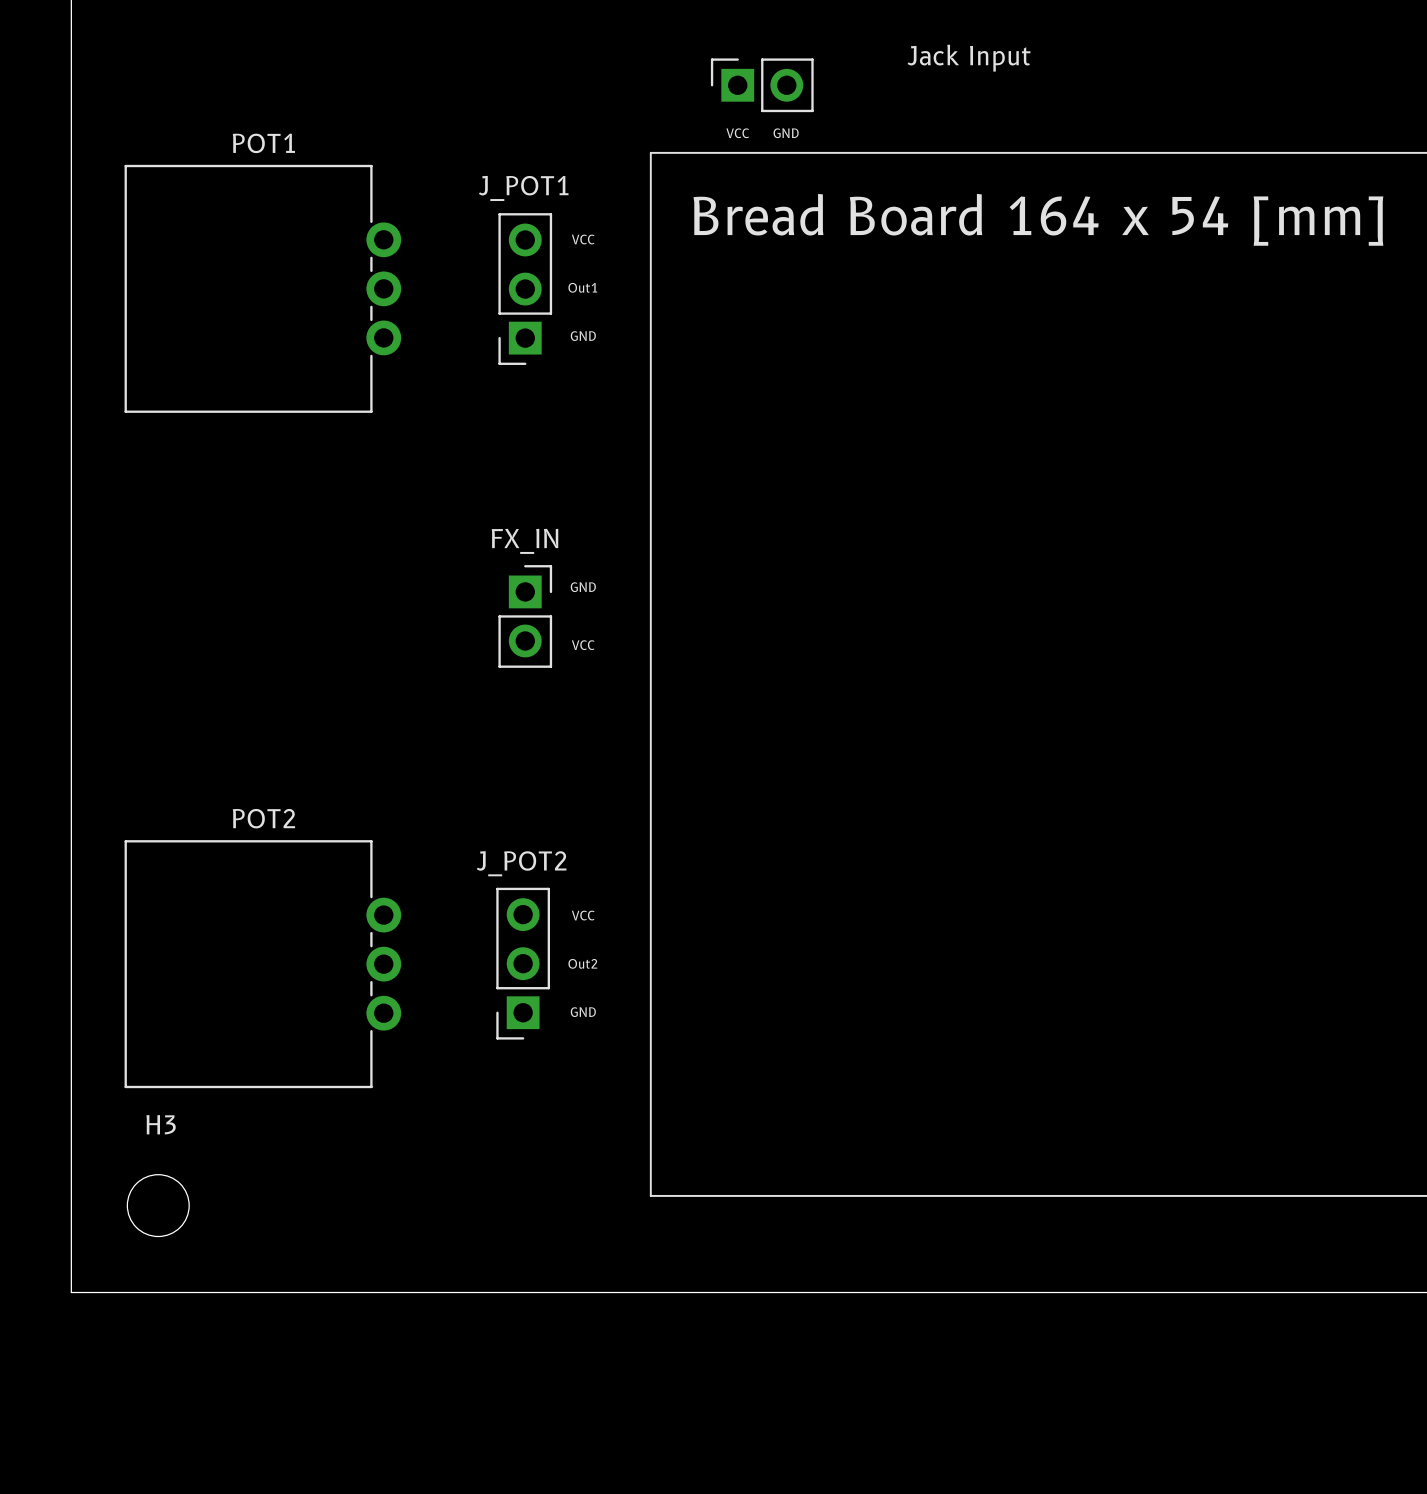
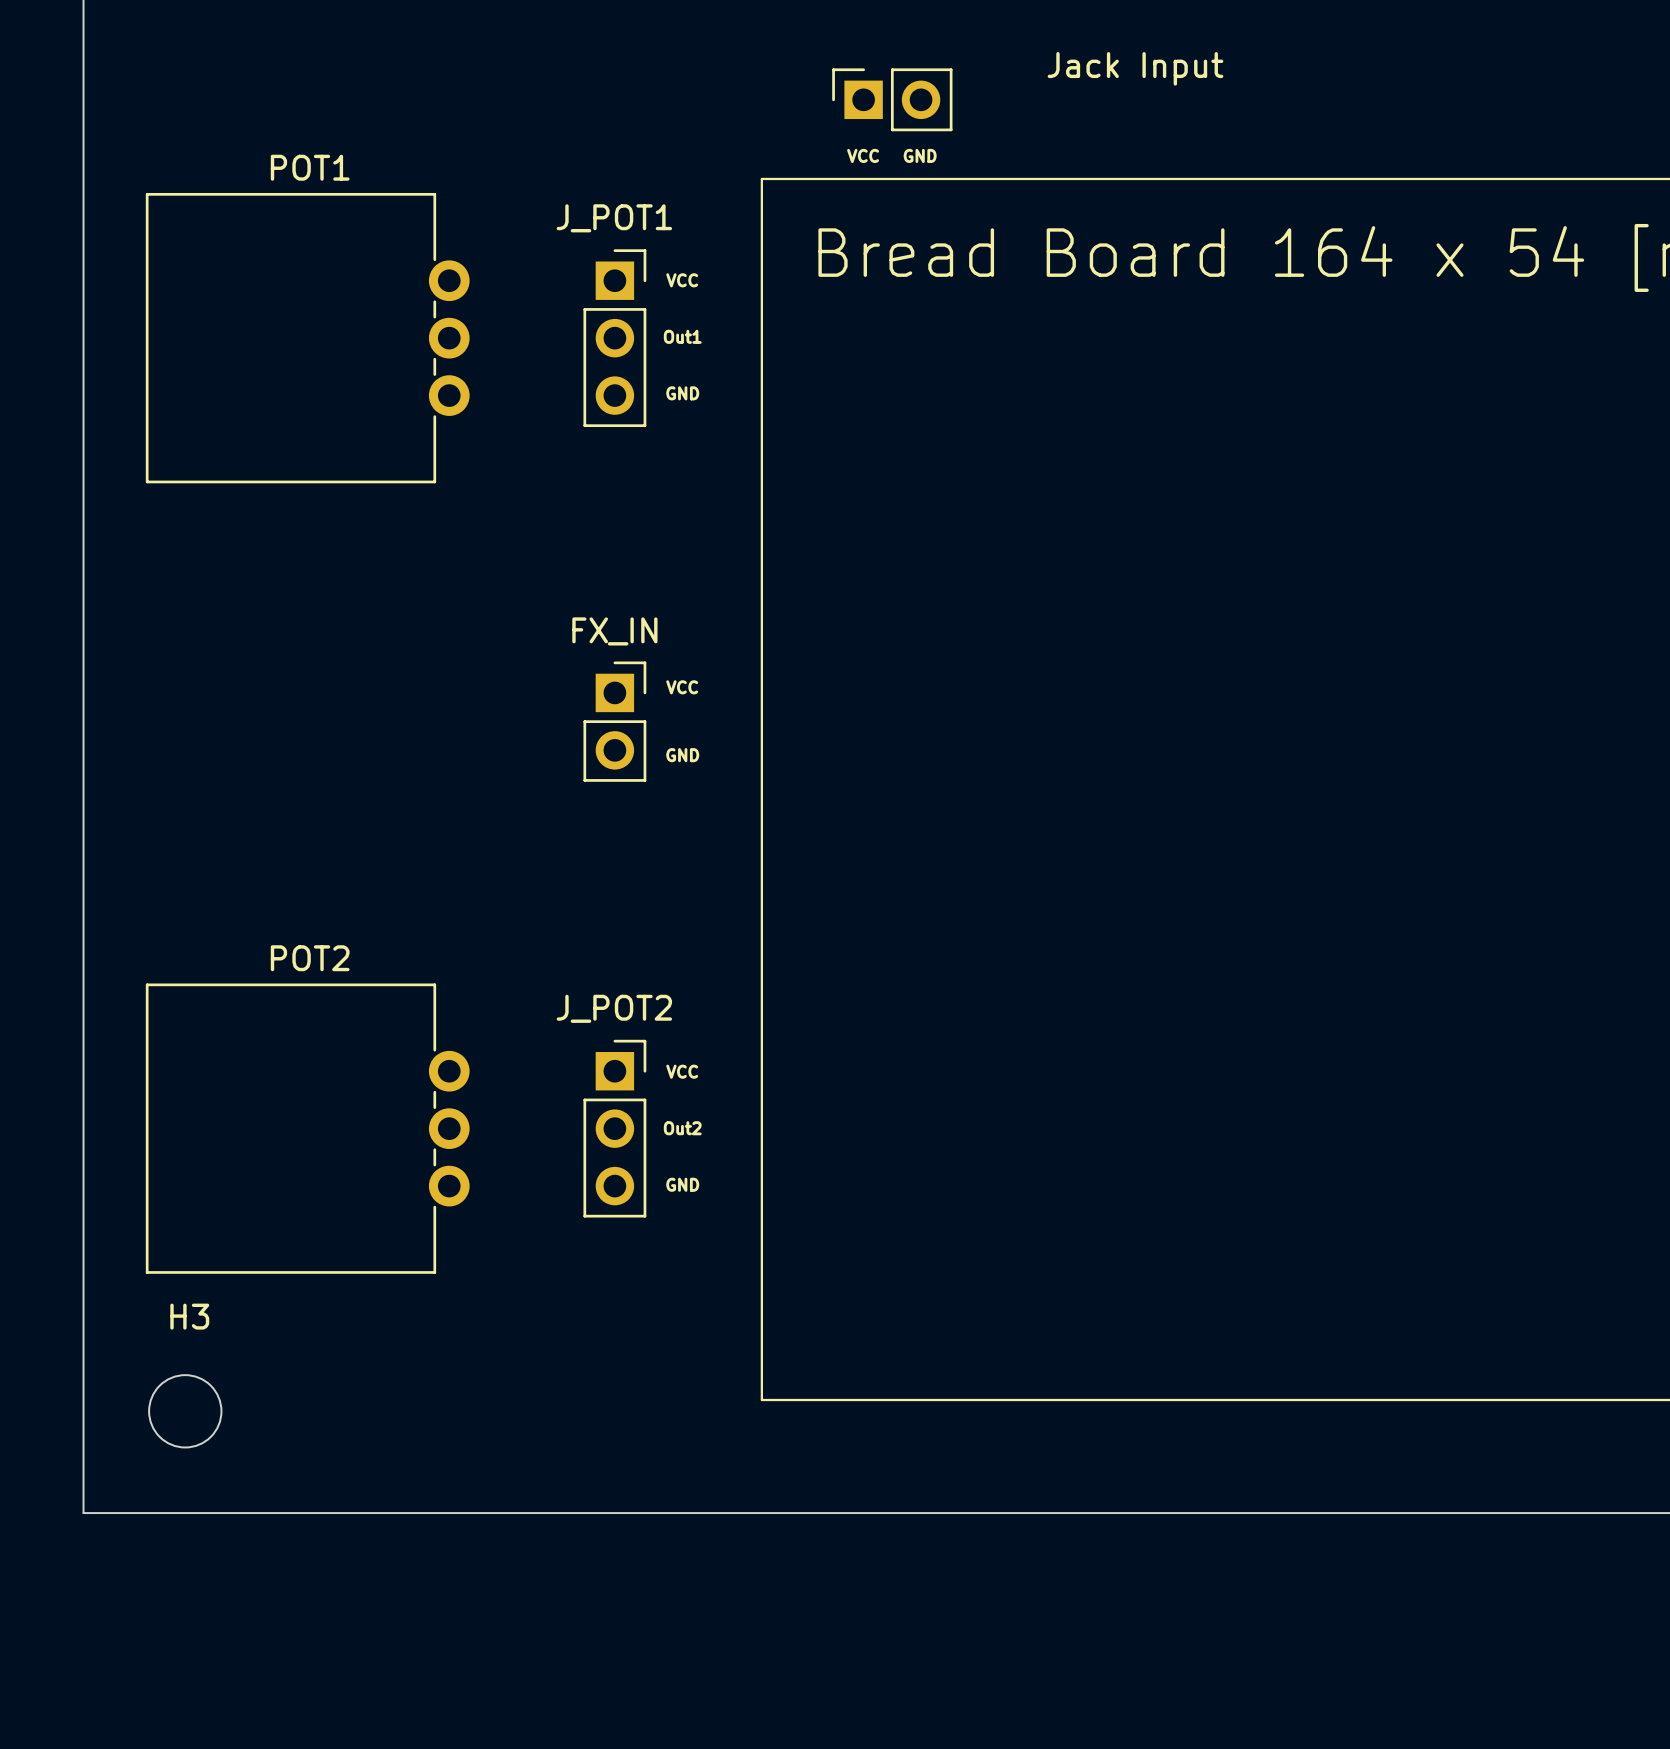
J_POT1 rotation: 0° (525, 289) -> 180° (614, 338)
text: GND (583, 587) -> VCC (682, 687)
text: VCC (583, 645) -> GND (682, 755)
J_POT2 rotation: 0° (523, 963) -> 180° (614, 1128)

